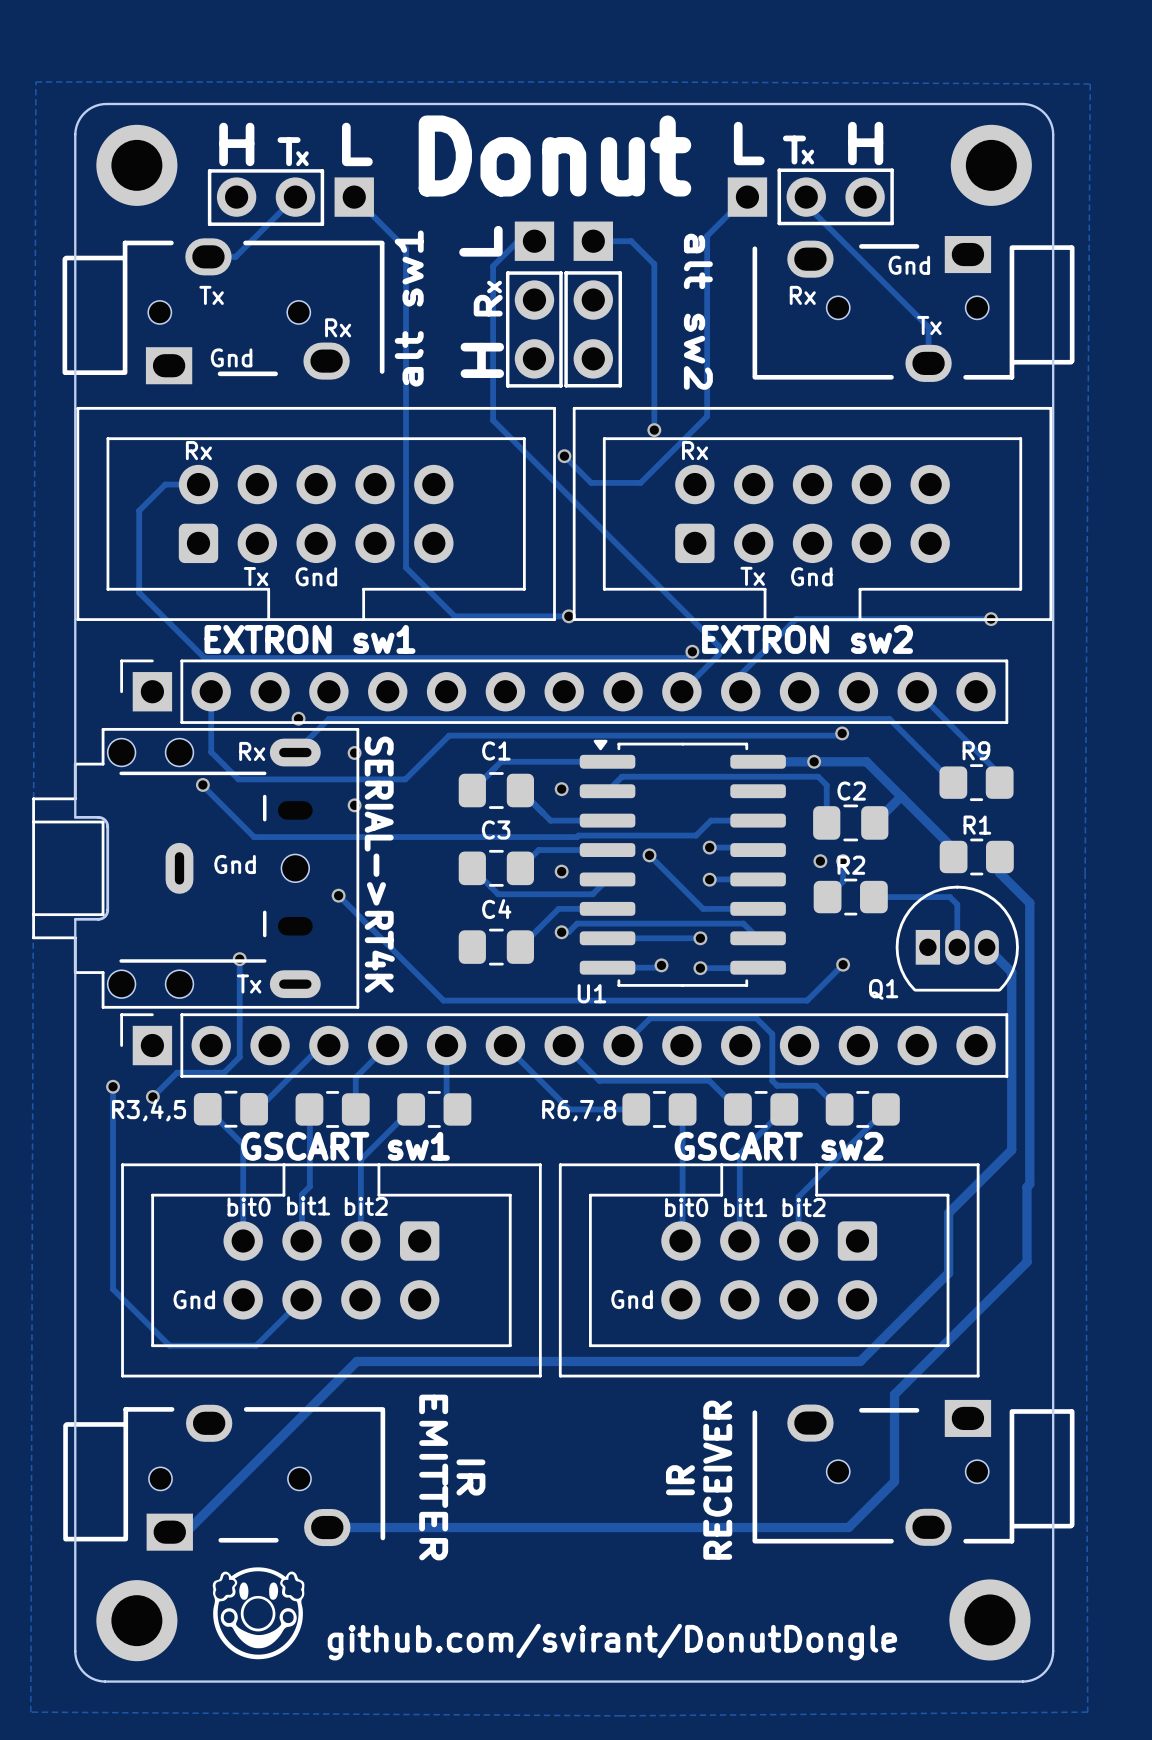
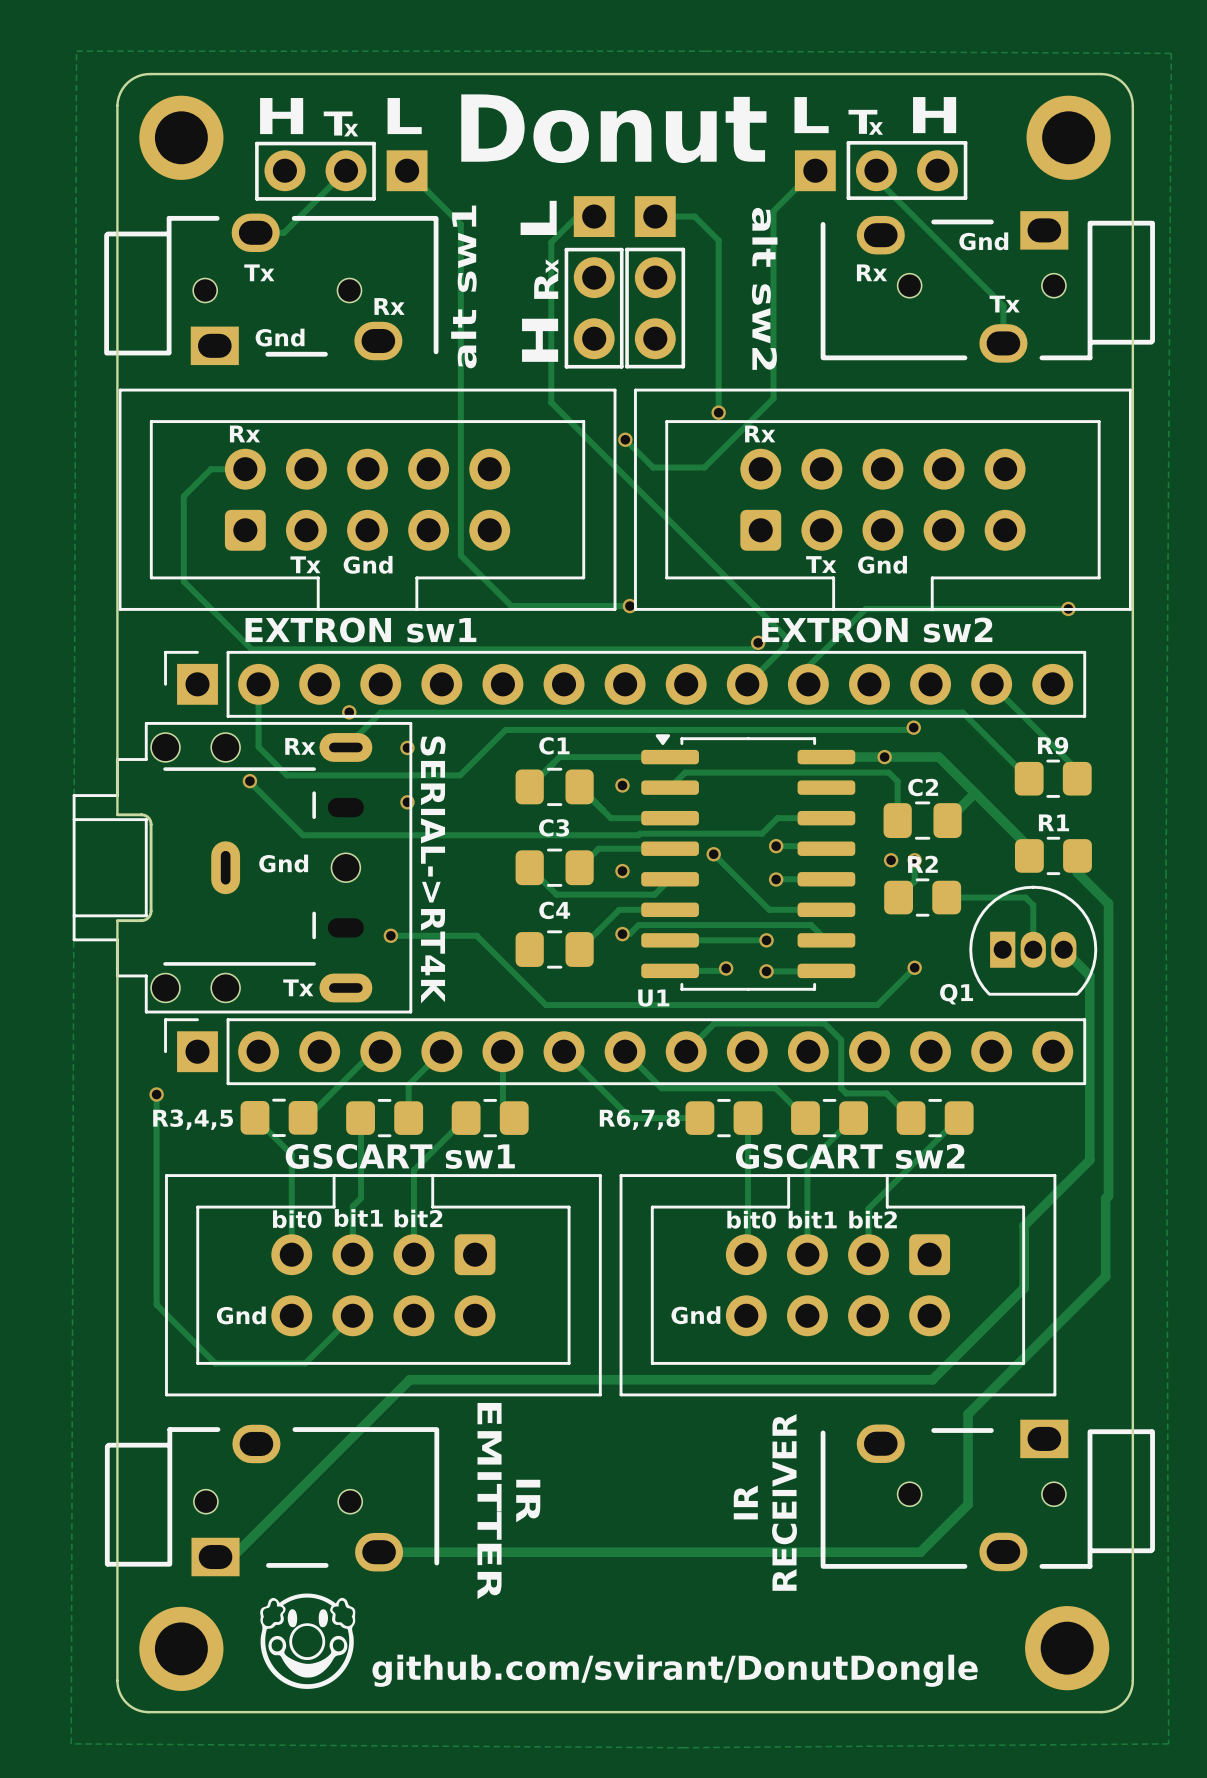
track: (338, 895) (443, 1000) (488, 1000) -> (390, 935) (476, 935) (545, 1005)
via position: (338, 895) -> (390, 935)
track: (239, 959) (239, 1057) (224, 1072) (177, 1072) (152, 1096) -> none
via: (239, 959) -> none
via: (152, 1096) -> none

